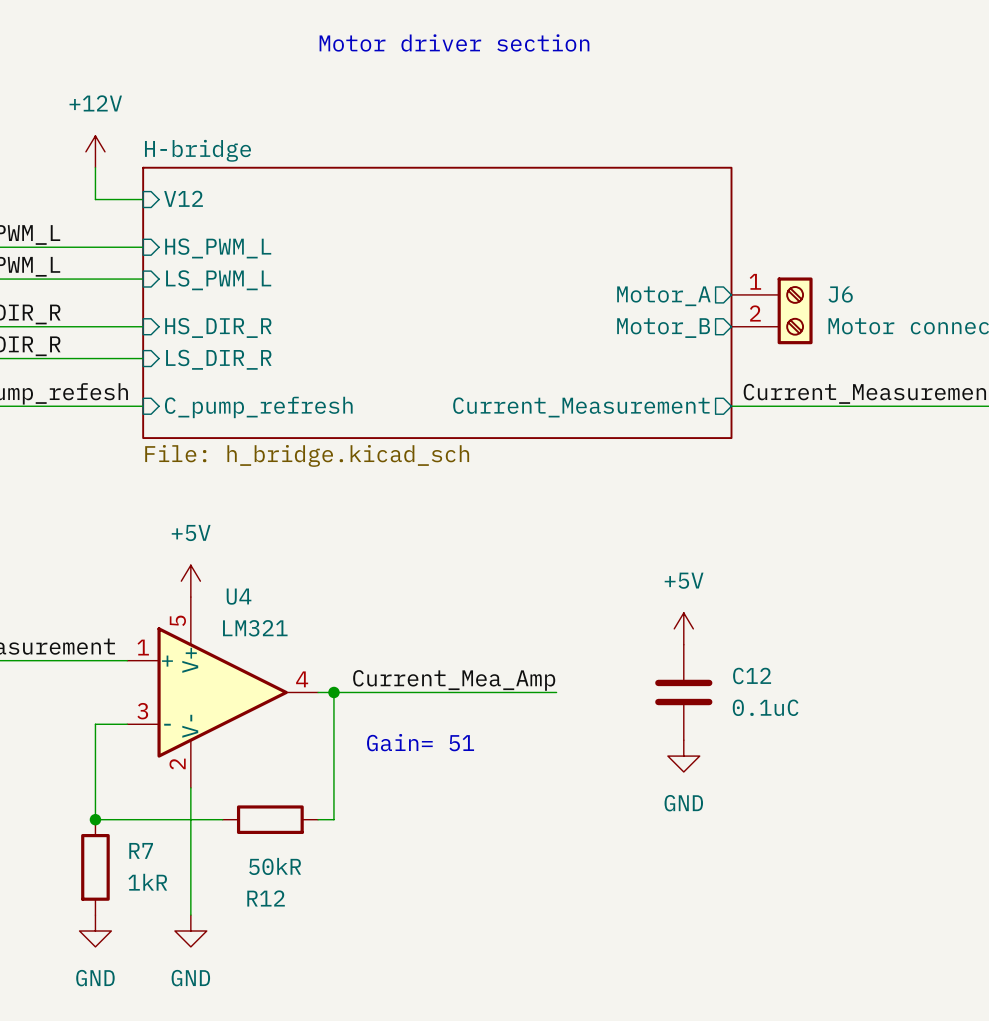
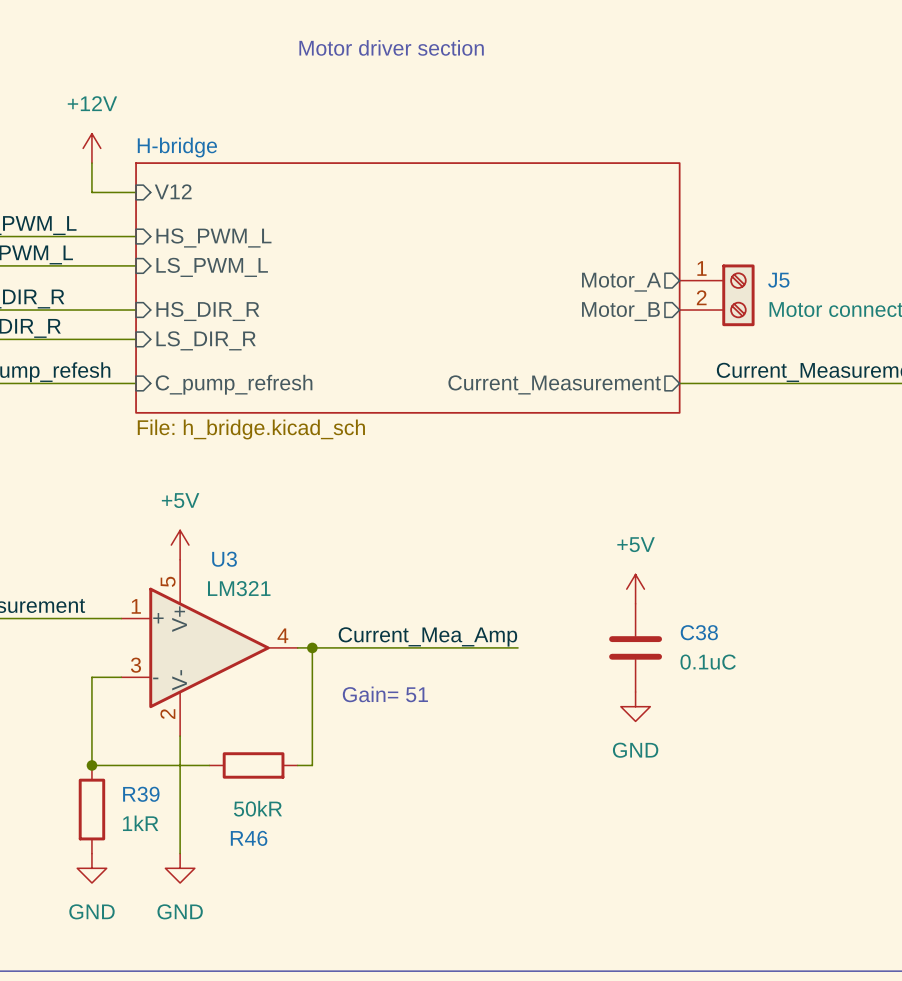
J6 name: J6 (840, 294) -> J5 (778, 280)
U4 name: U4 (239, 596) -> U3 (224, 559)
C12 name: C12 (752, 675) -> C38 (699, 632)
R7 name: R7 (141, 850) -> R39 (141, 794)
R12 name: R12 (266, 898) -> R46 (249, 838)

